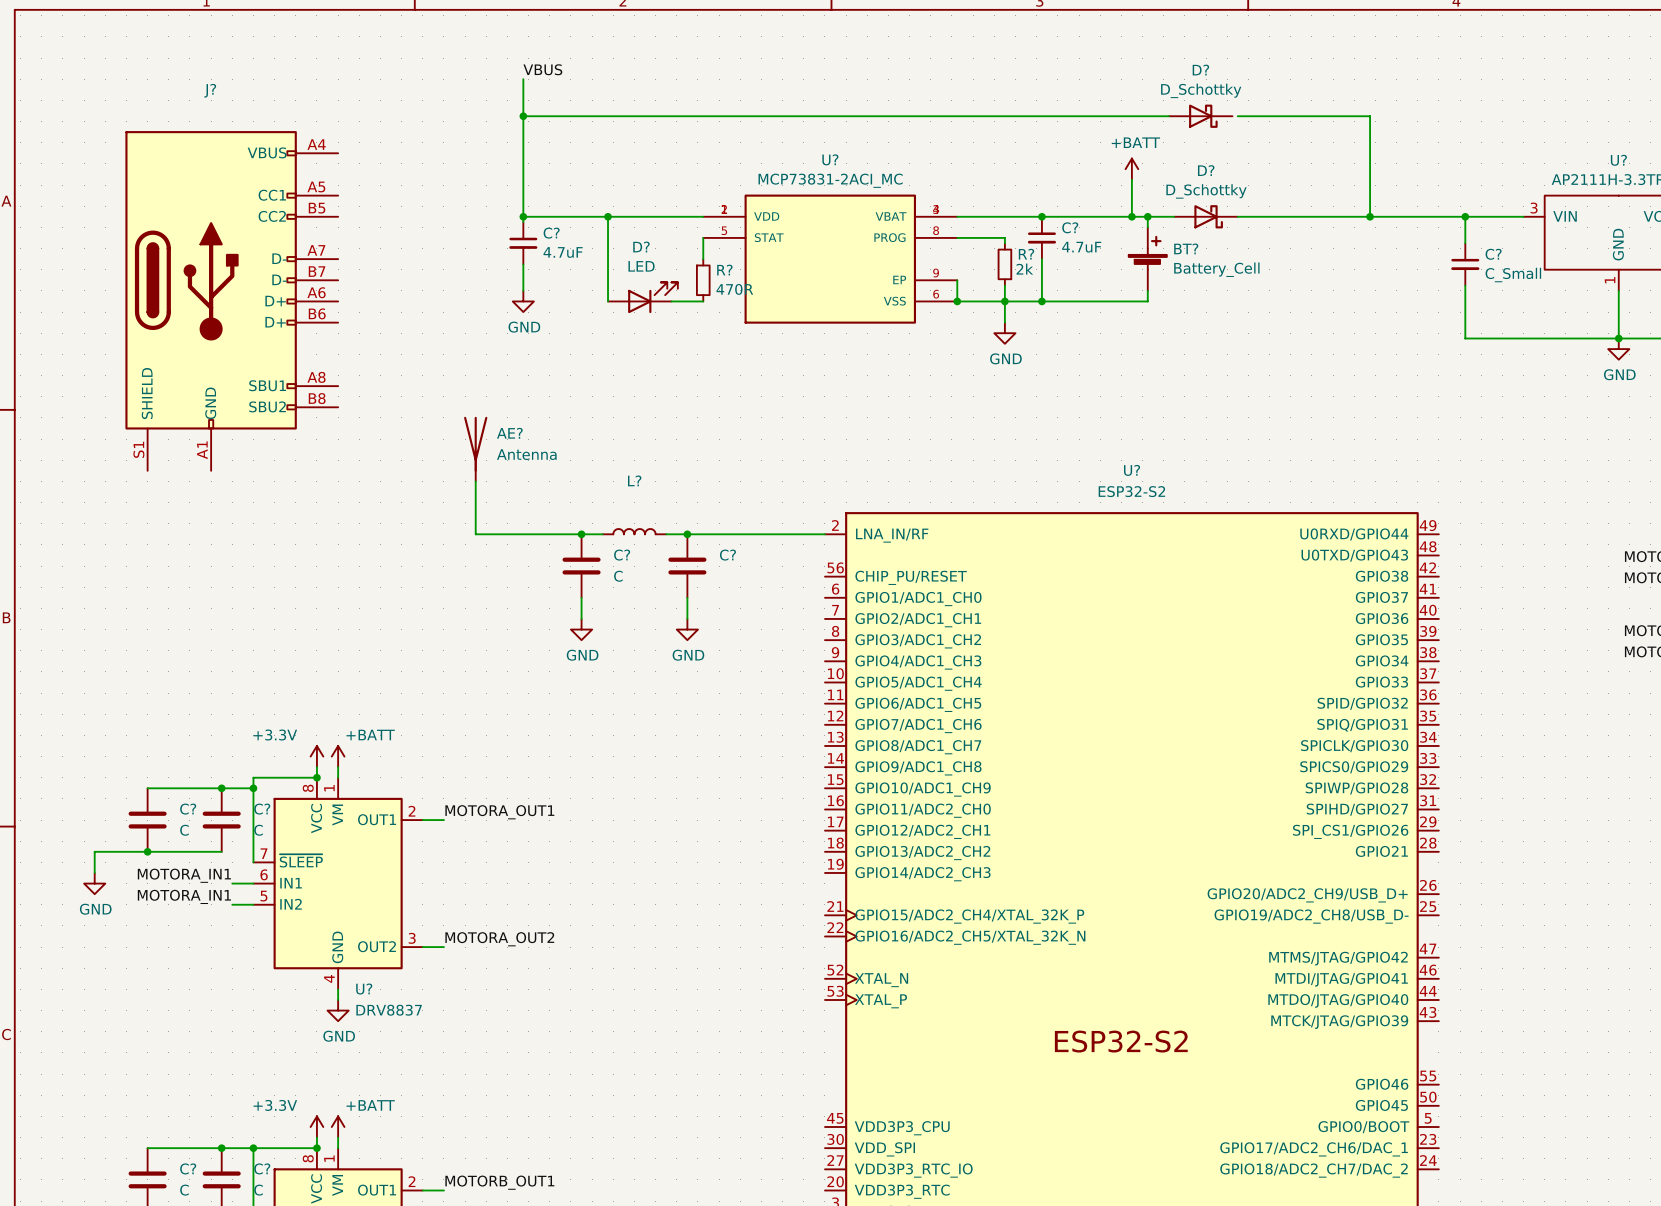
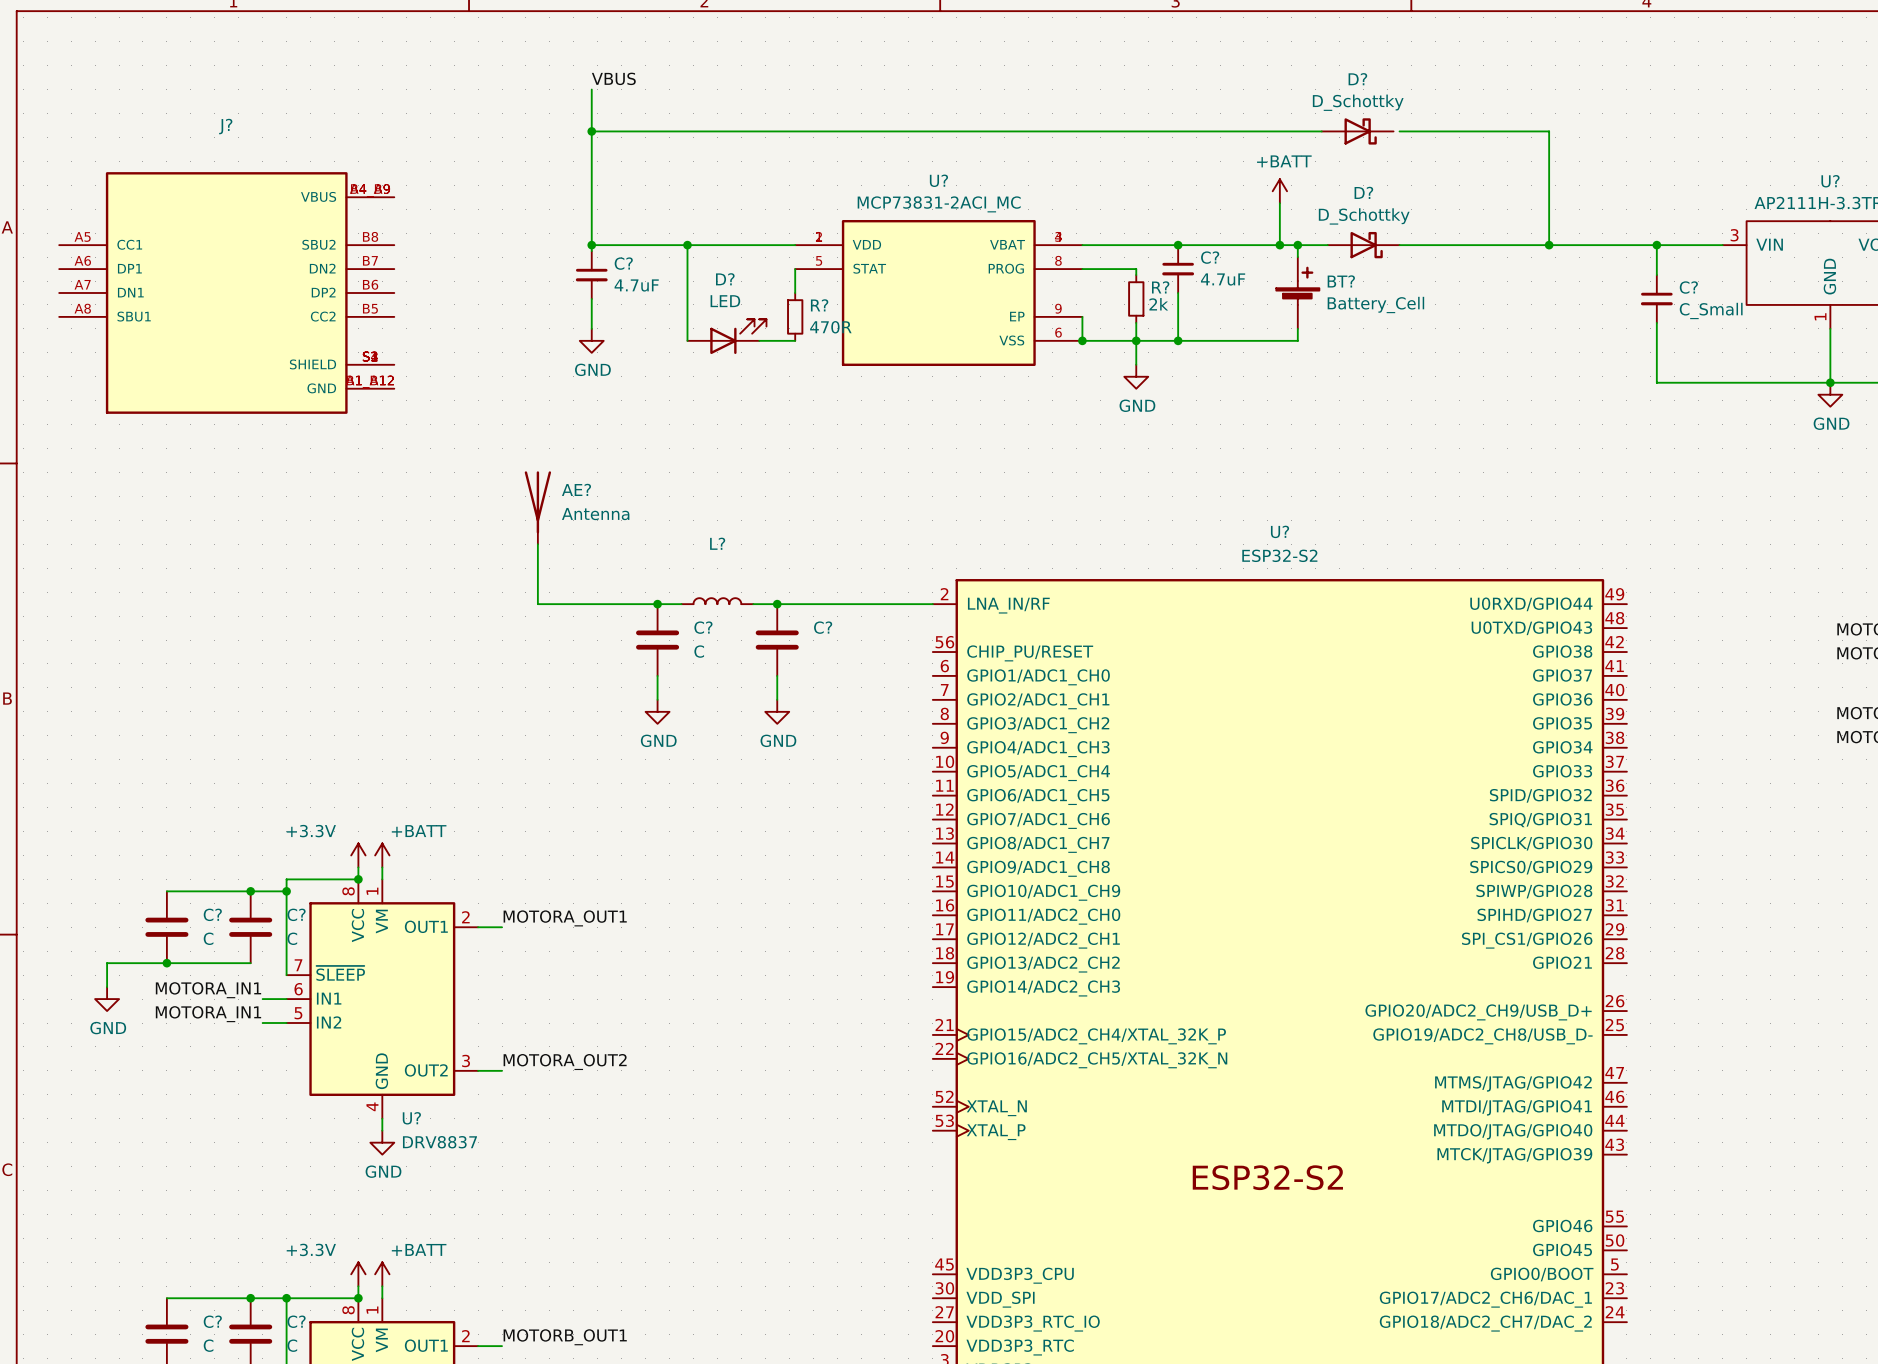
J?: none -> (226, 292)
J?: (231, 300) -> none

